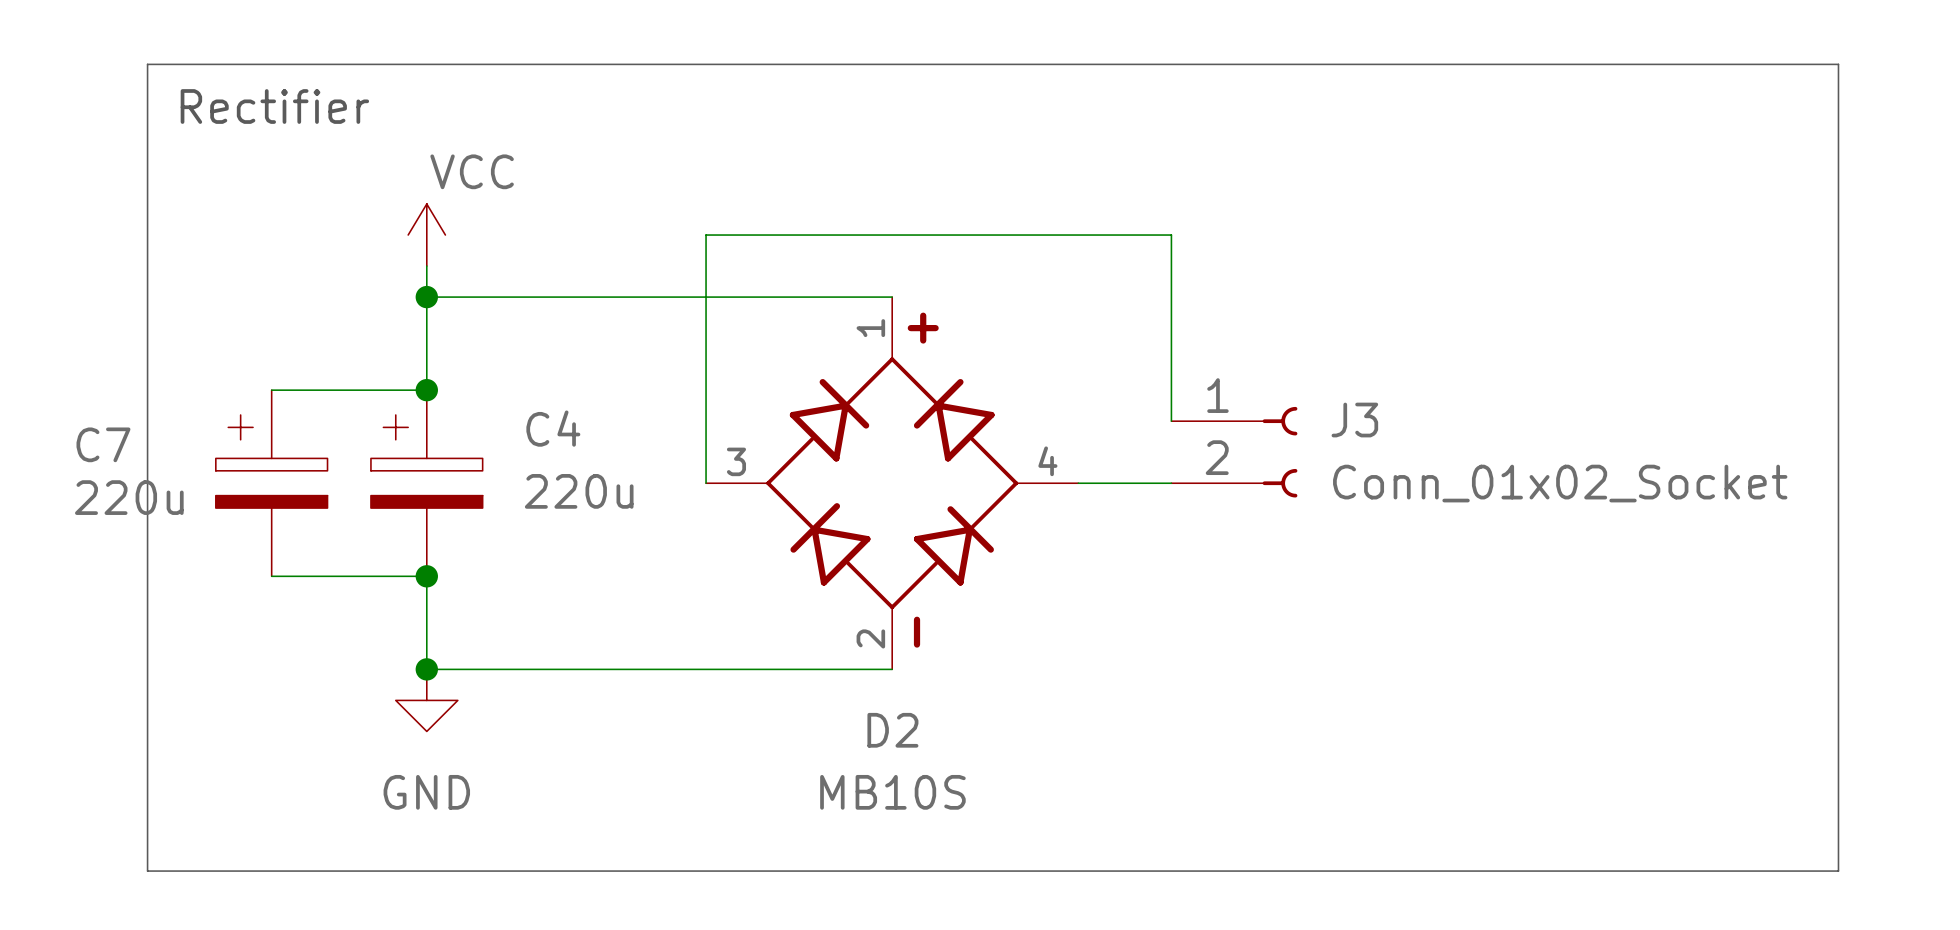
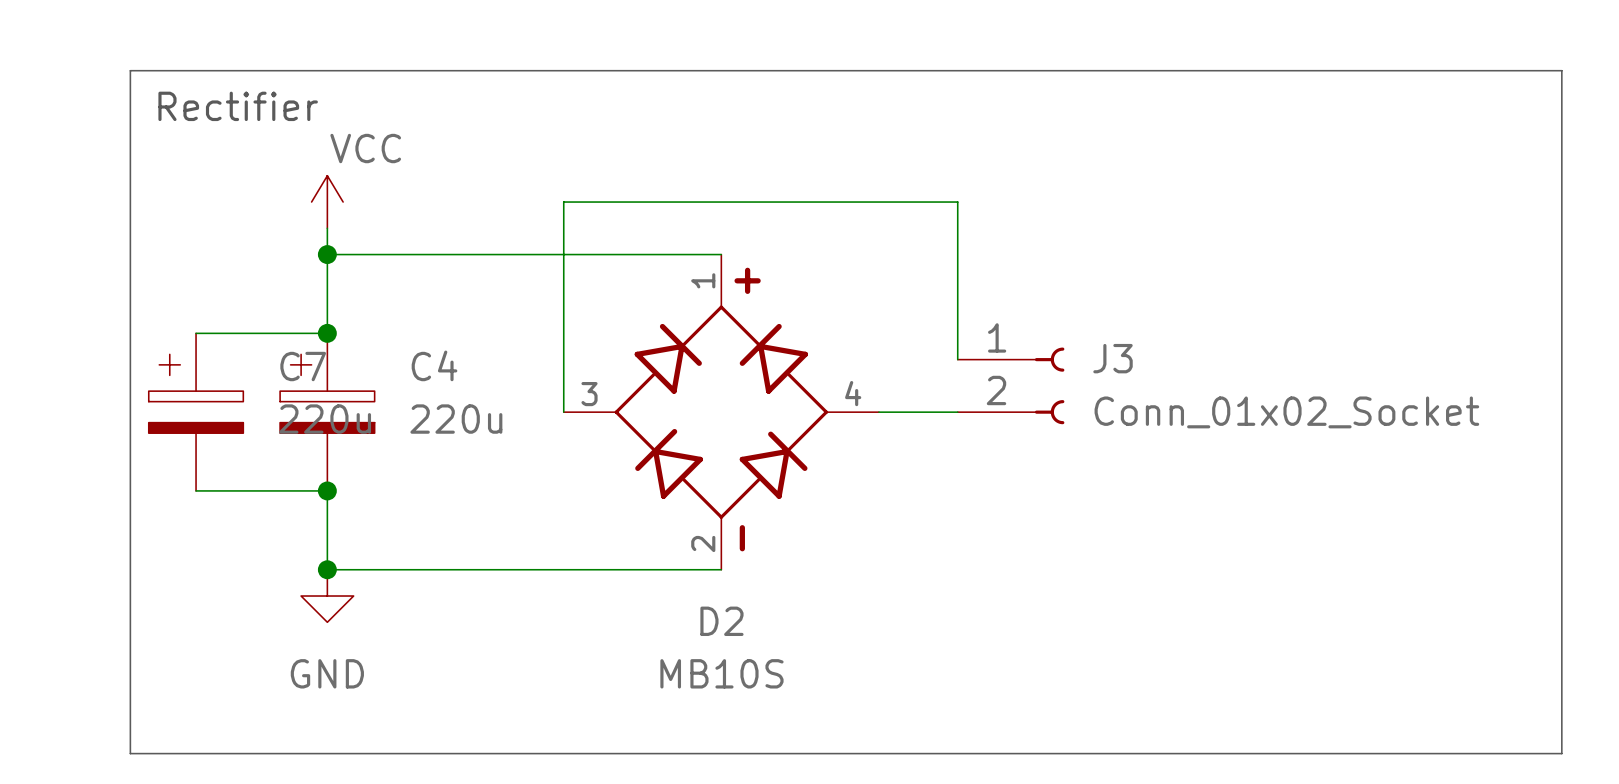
line: (147, 64) (1838, 64) (1838, 871) (147, 871) (147, 64) -> (130, 70) (1561, 70) (1561, 753) (130, 753) (130, 70)
text position: Rectifier (274, 106) -> Rectifier (238, 106)
C7 name position: C7 (103, 444) -> C7 (303, 366)
C7 value position: 220u (129, 497) -> 220u (325, 419)

